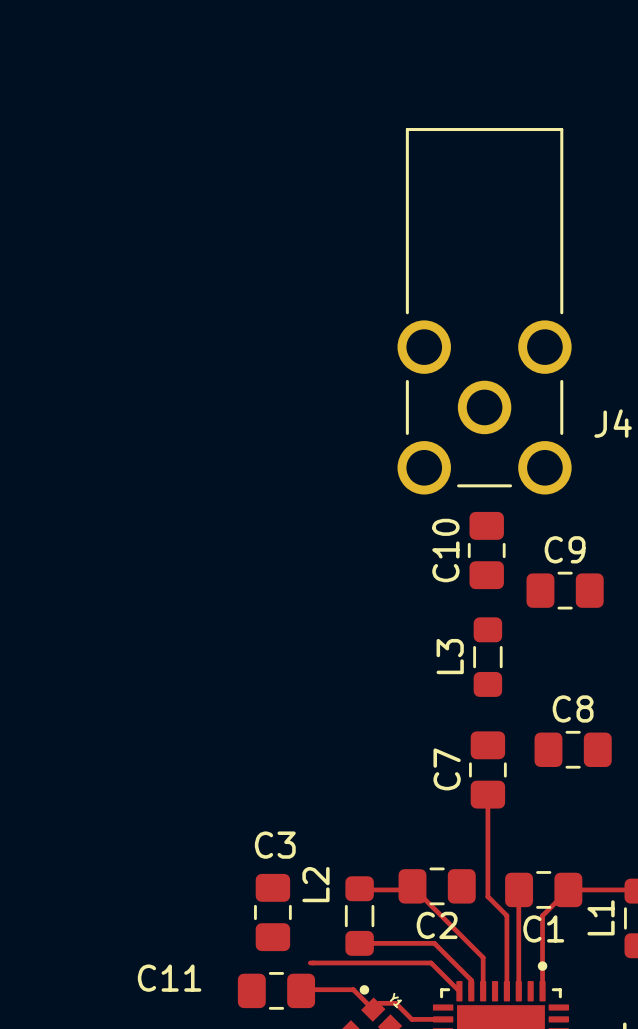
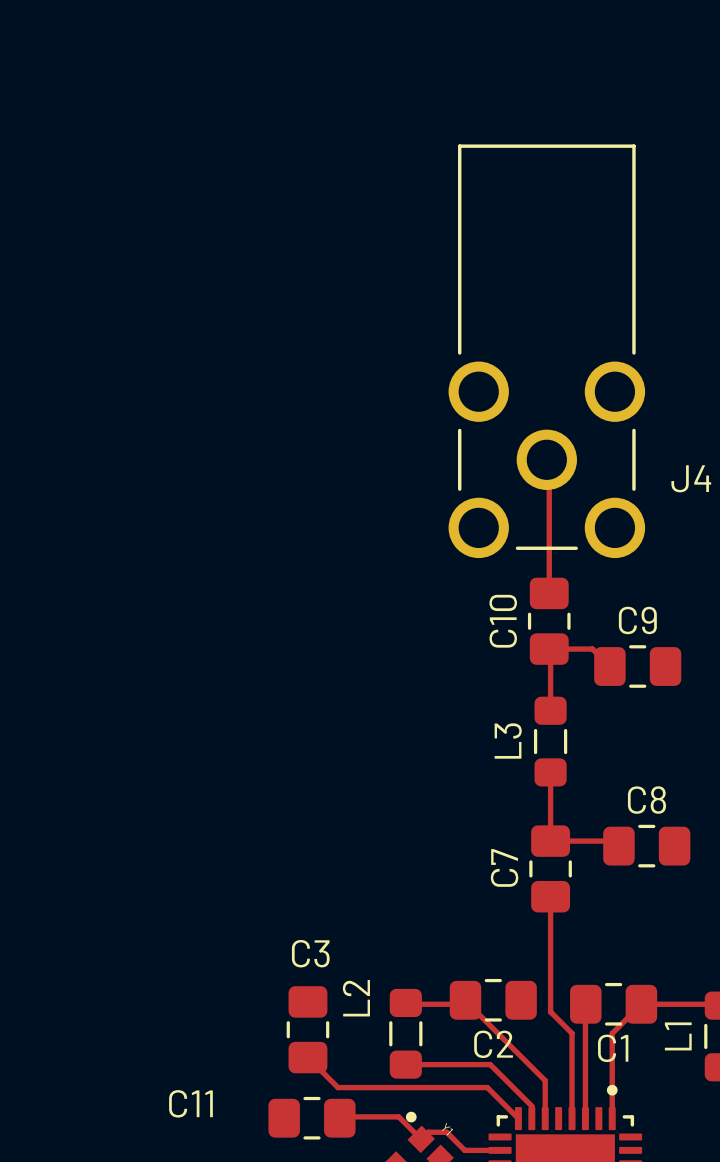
top track: none -> (546, 459) (549, 462) (549, 593)
top track: none -> (609, 666) (592, 649) (549, 649) (550, 710)
top track: none -> (550, 772) (550, 841) (613, 841) (618, 846)
top track: (310, 962) (431, 963) -> (307, 1057) (338, 1087) (487, 1087)

